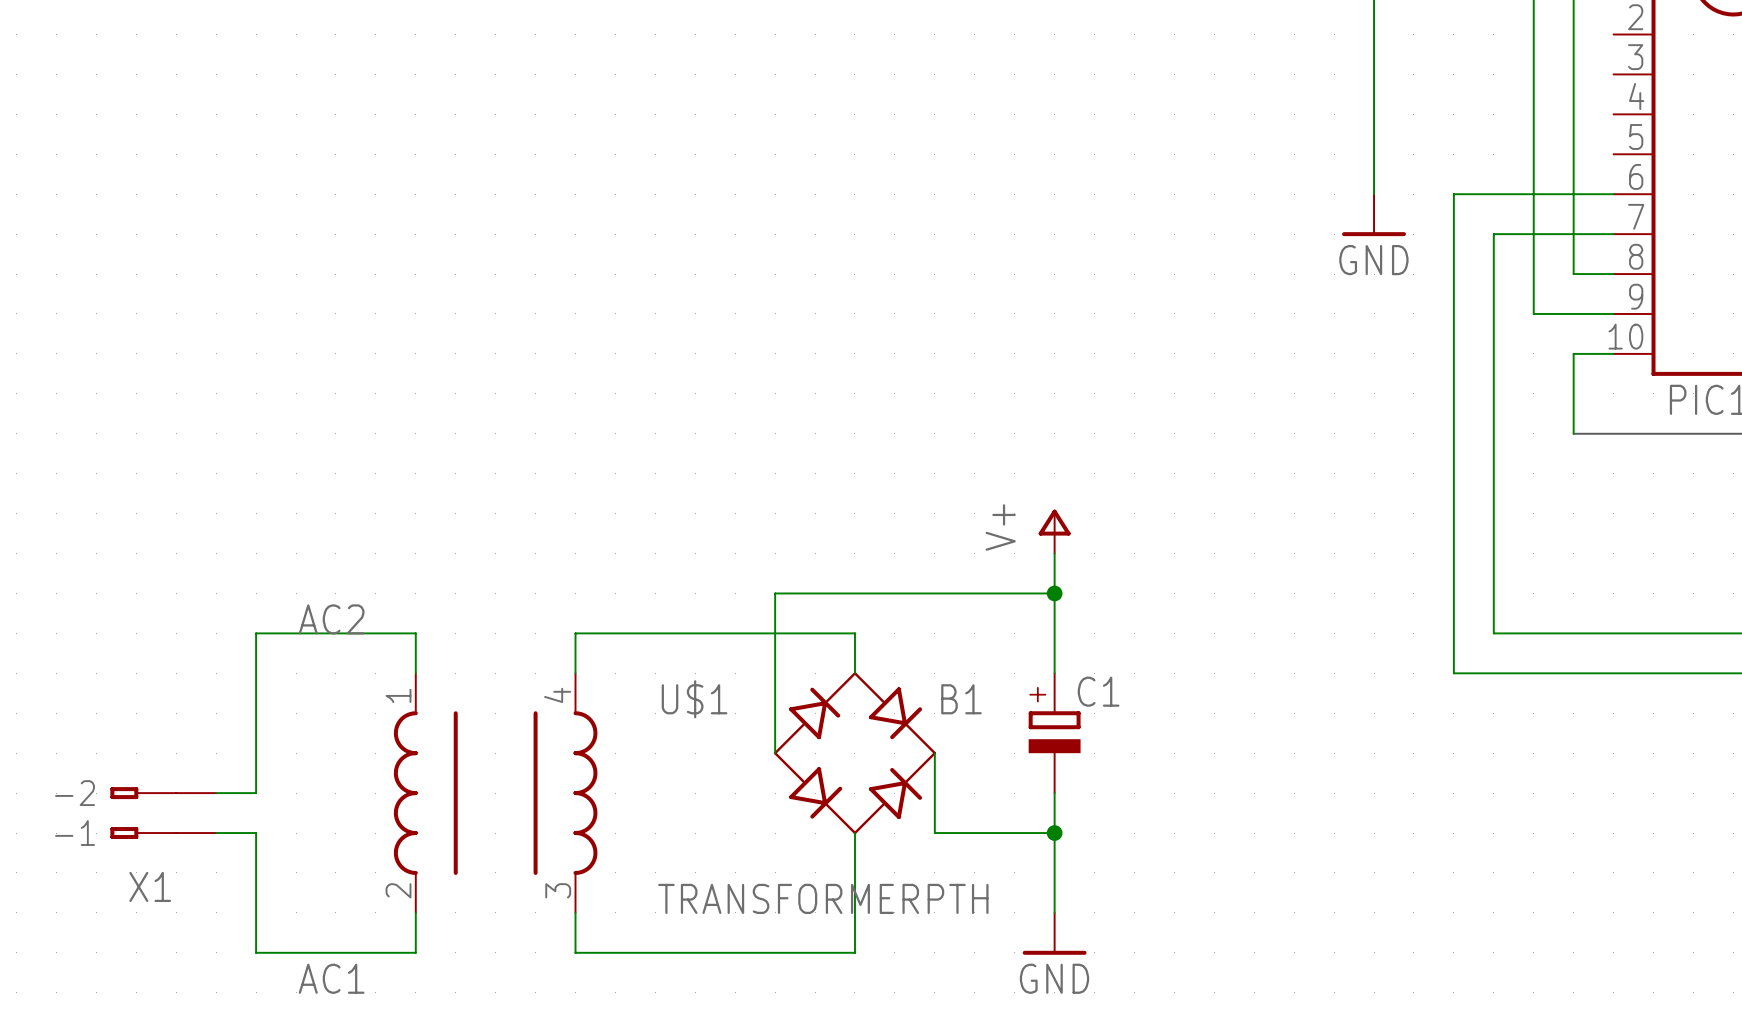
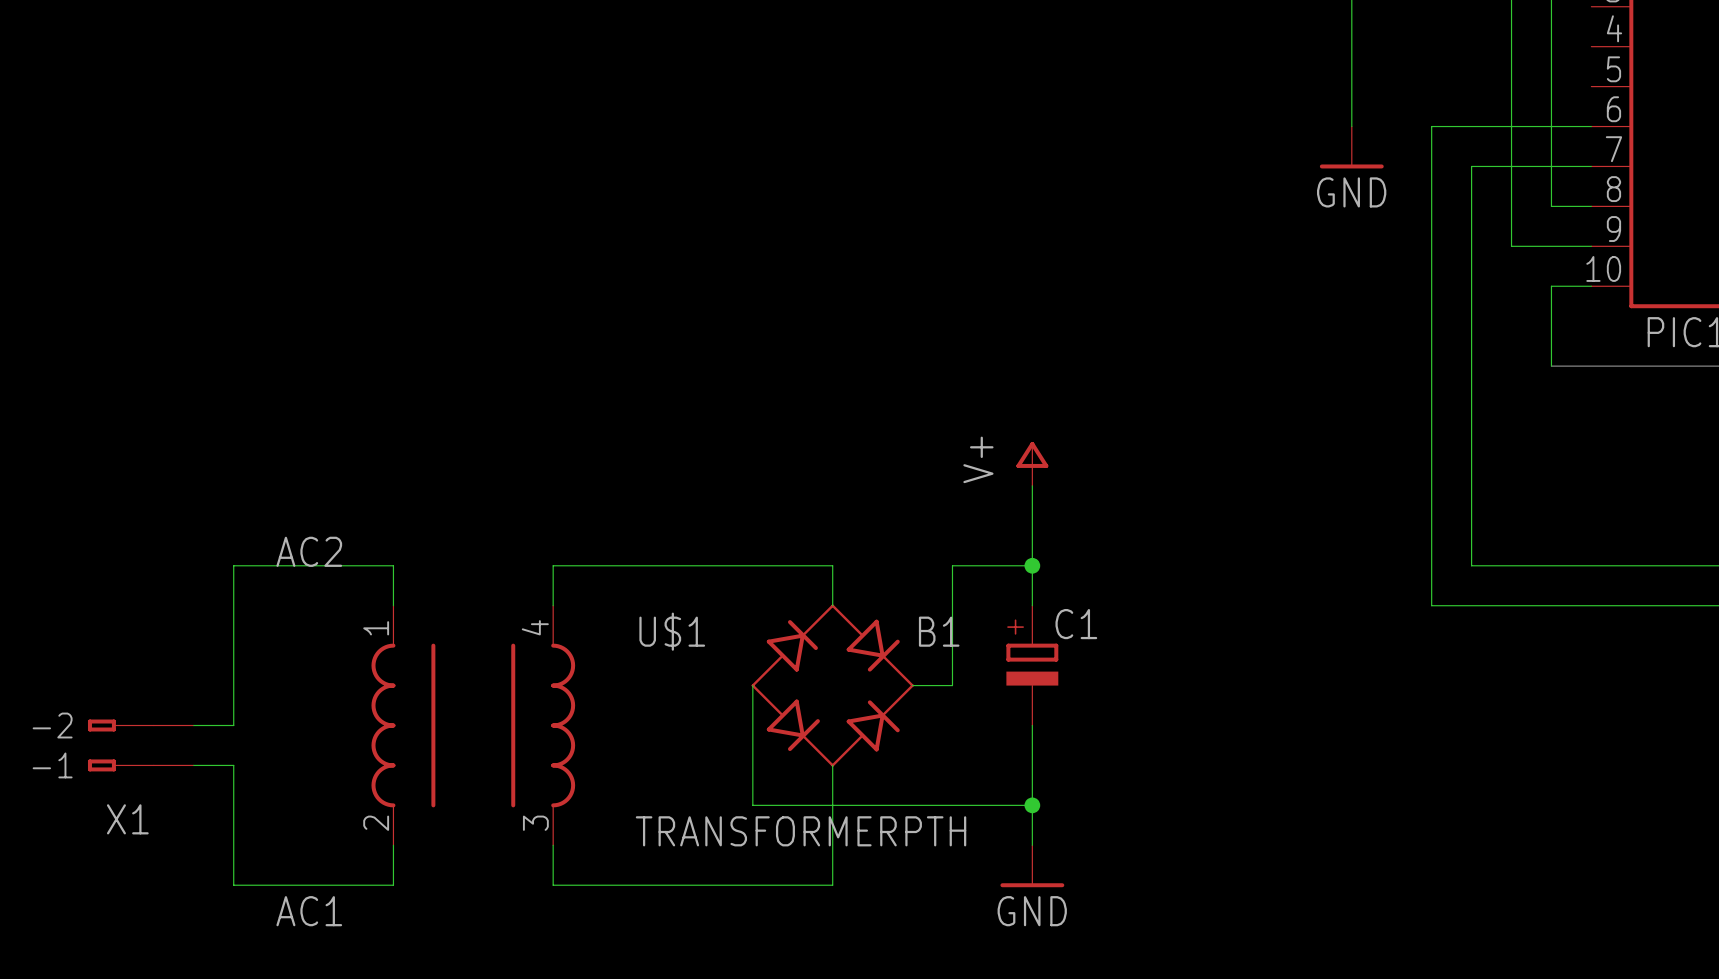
wire: (1054, 593) (775, 593) (775, 753) -> (1032, 805) (752, 805) (752, 685)
junction position: (1054, 593) -> (1032, 565)
wire: (934, 753) (934, 833) (1054, 833) -> (912, 685) (952, 685) (952, 565) (1032, 565)
junction position: (1054, 833) -> (1032, 805)

